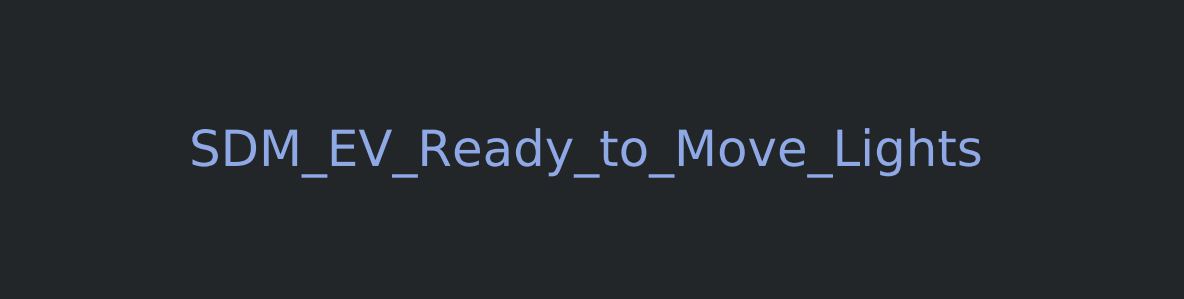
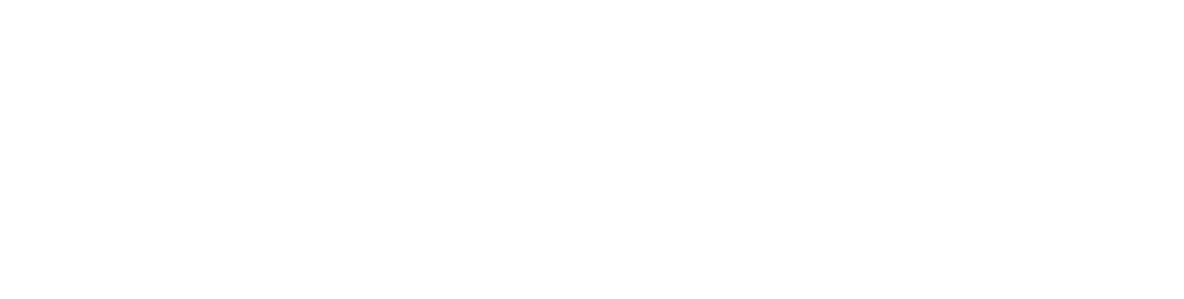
text: SDM_EV_Ready_to_Move_Lights (586, 152) -> none

